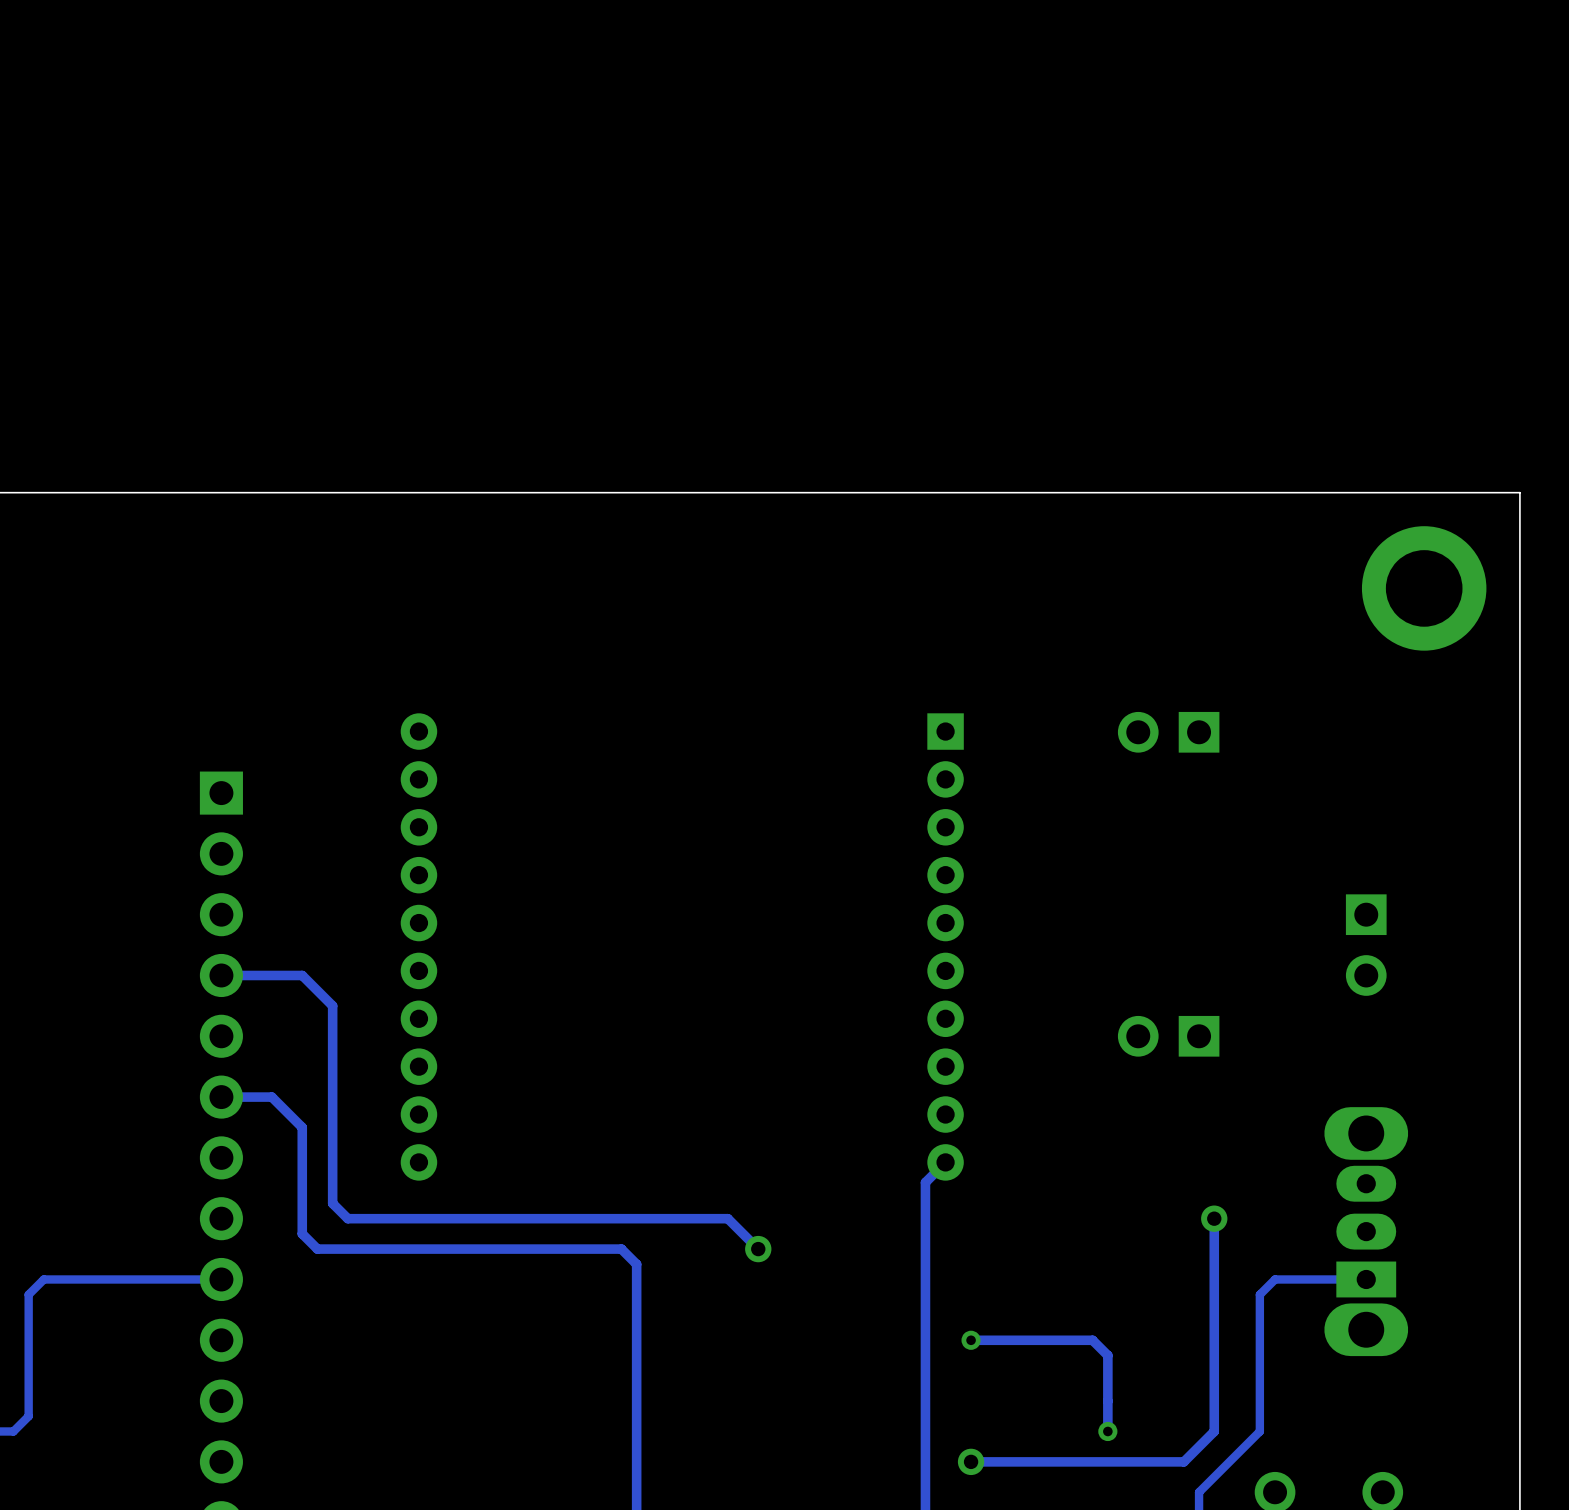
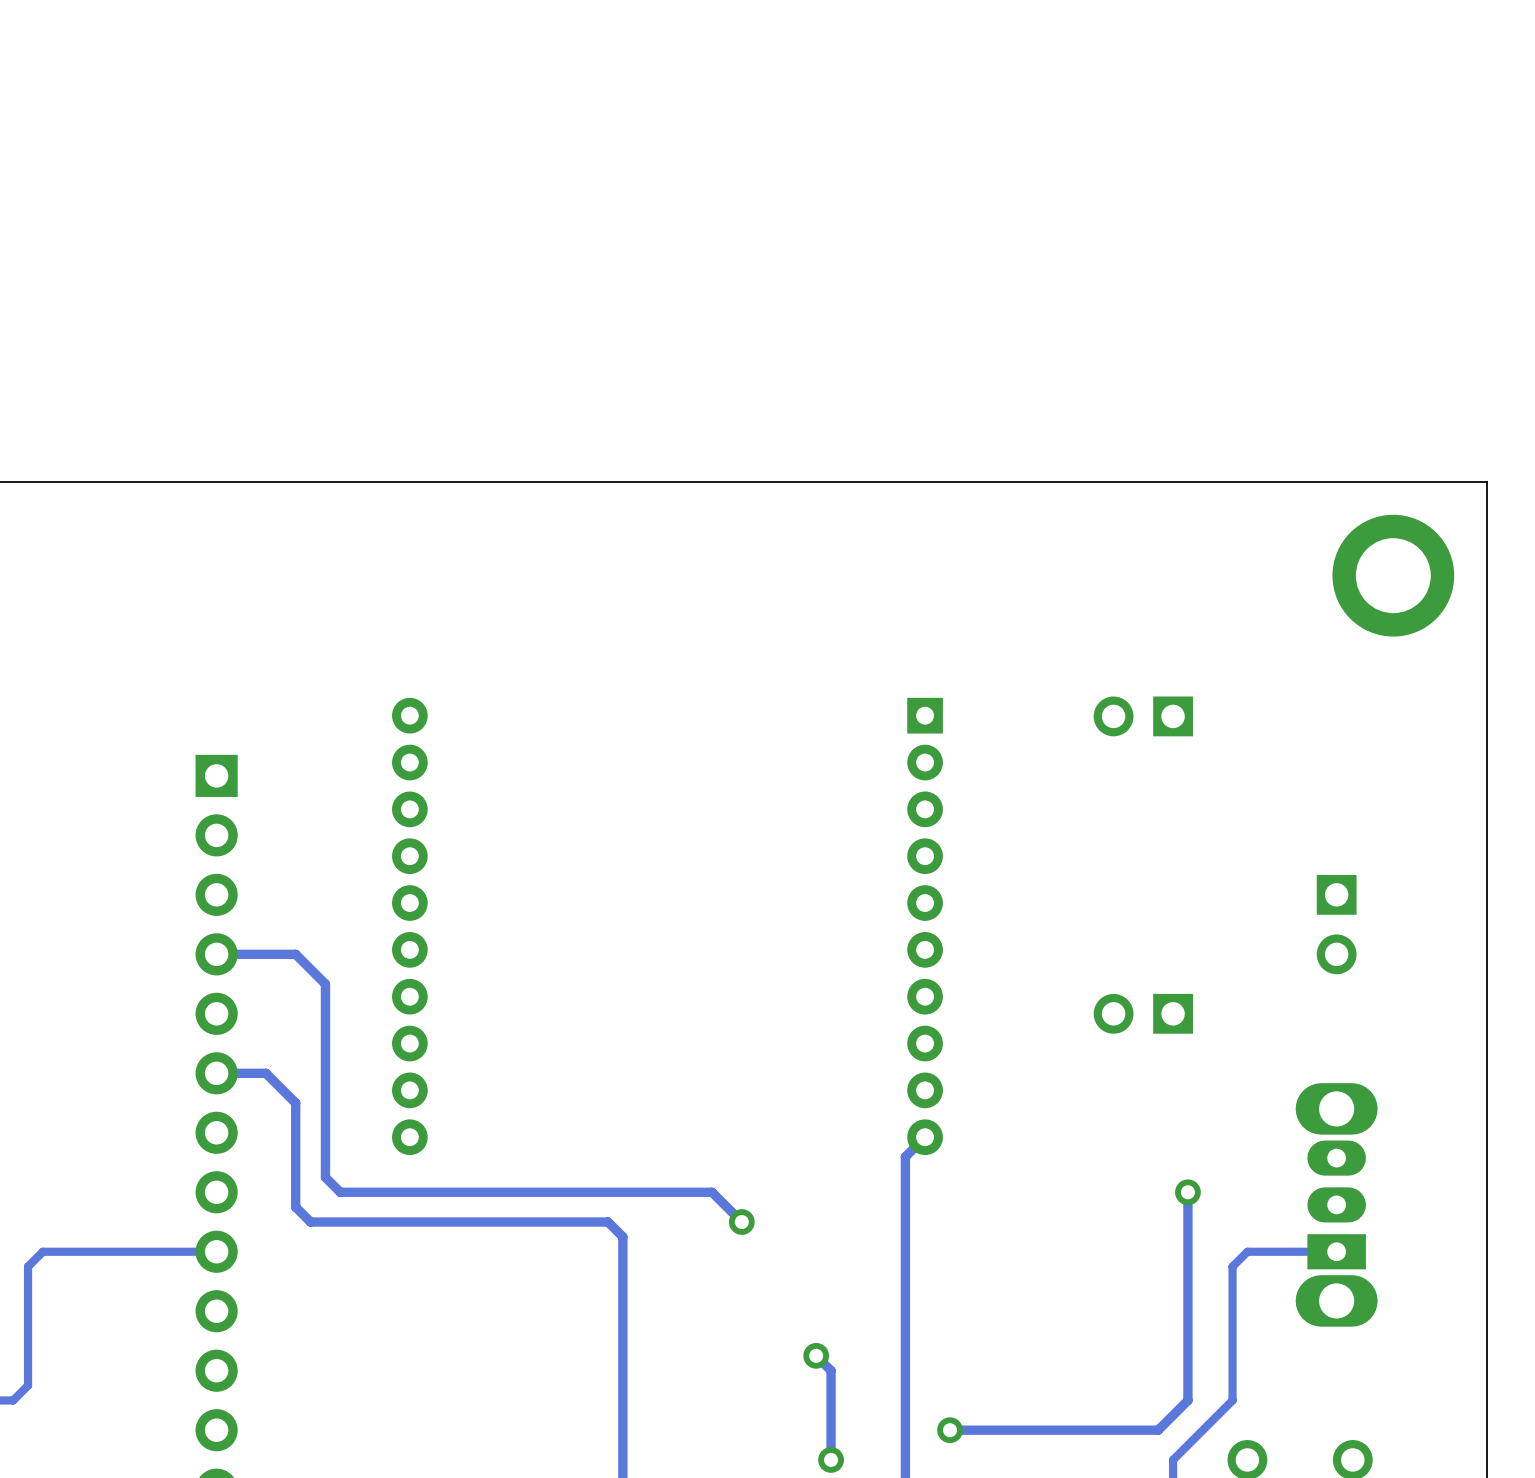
track: (971, 1340) (1092, 1340) (1107, 1355) (1107, 1431) -> none
via: (971, 1340) -> none
track: none -> (816, 1355) (831, 1370) (831, 1459)
via: none -> (816, 1355)
via: (1107, 1431) -> none
via: none -> (831, 1459)

